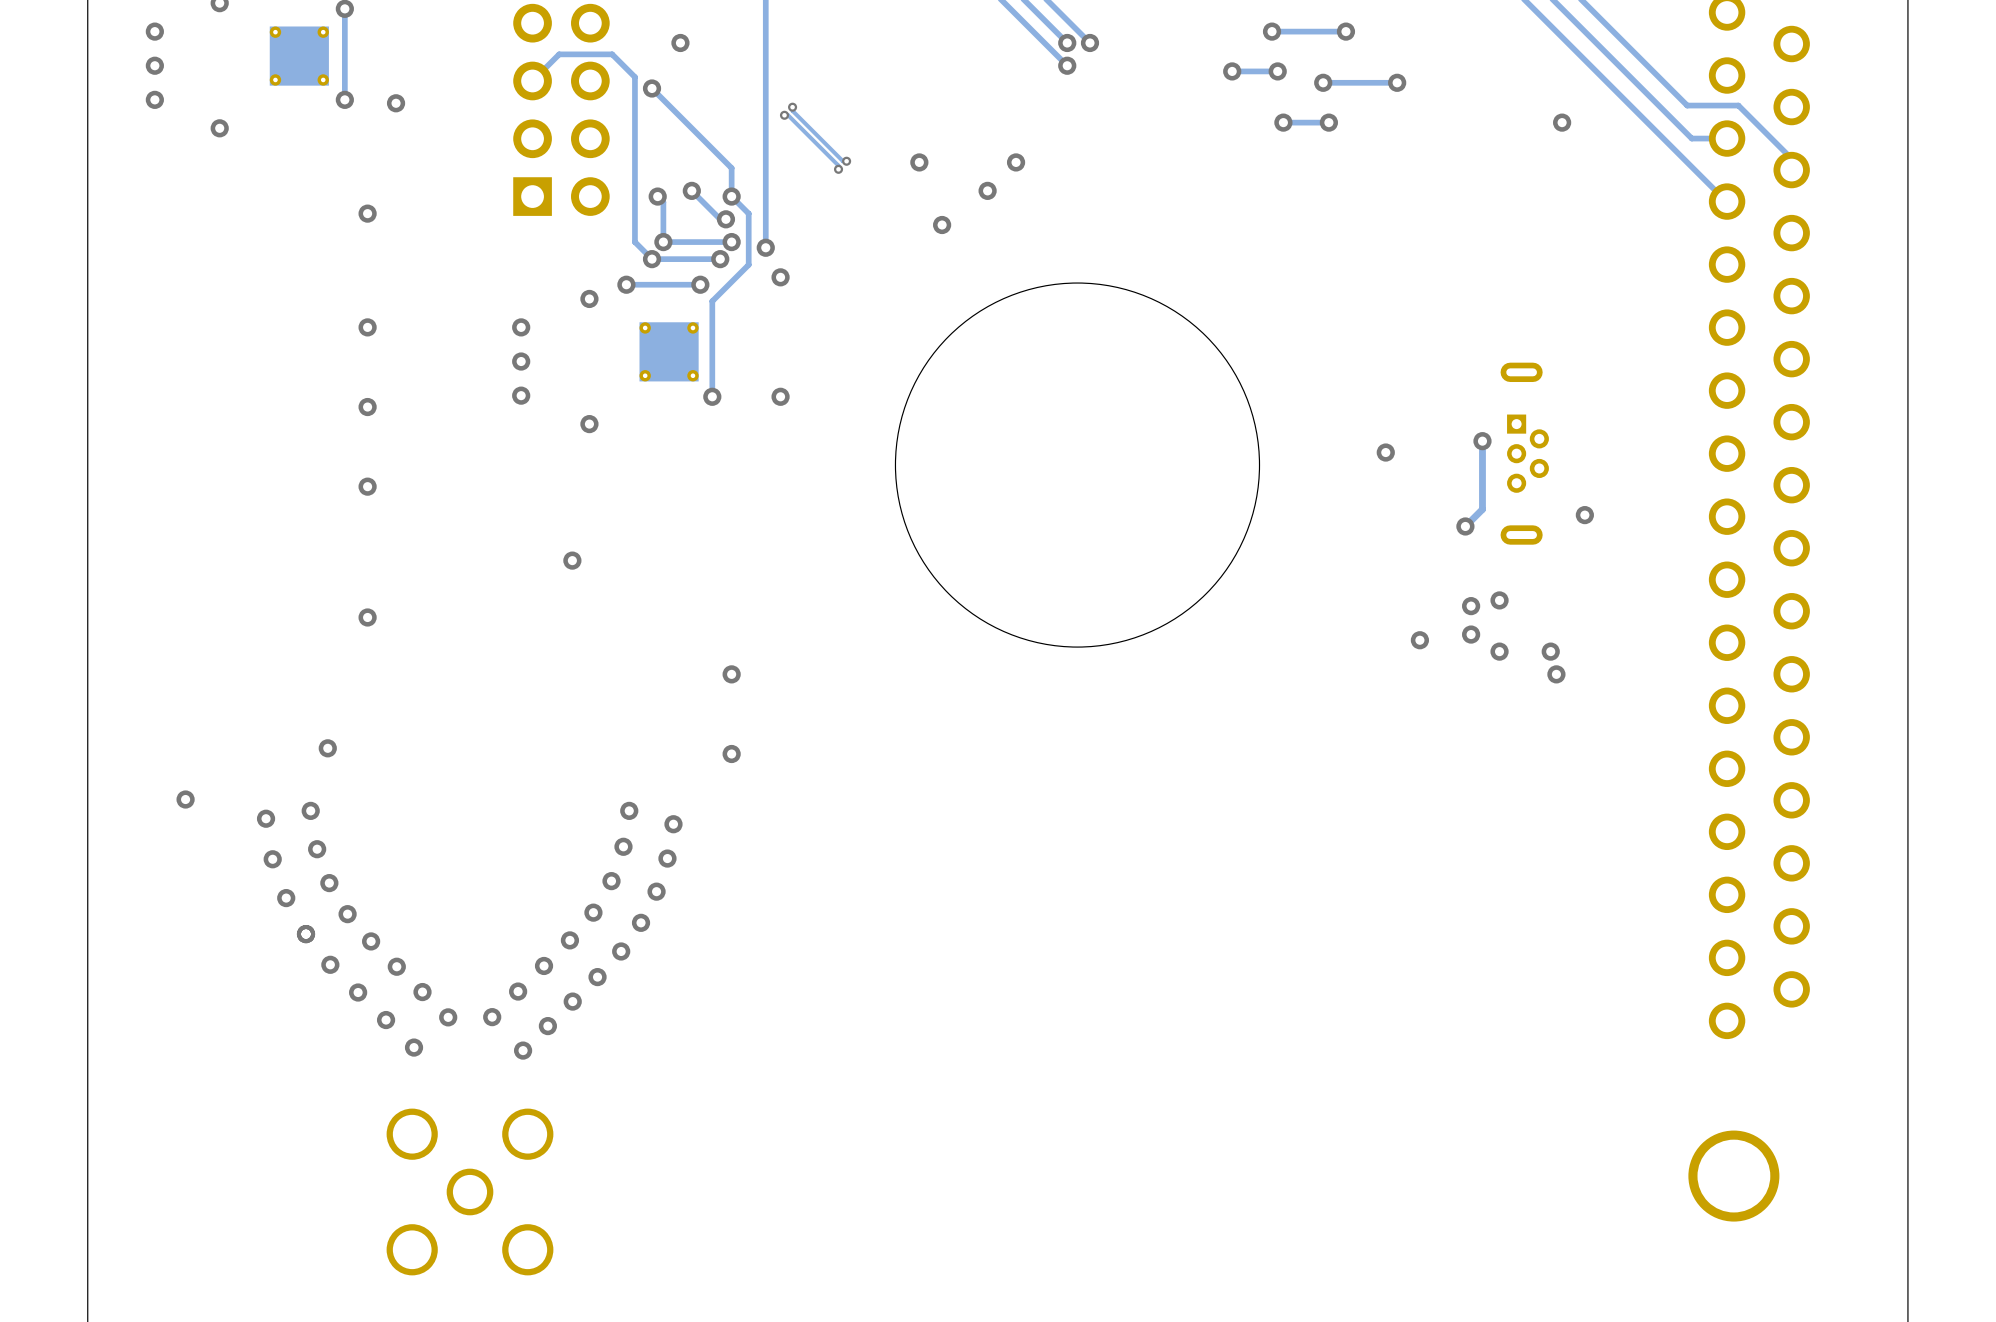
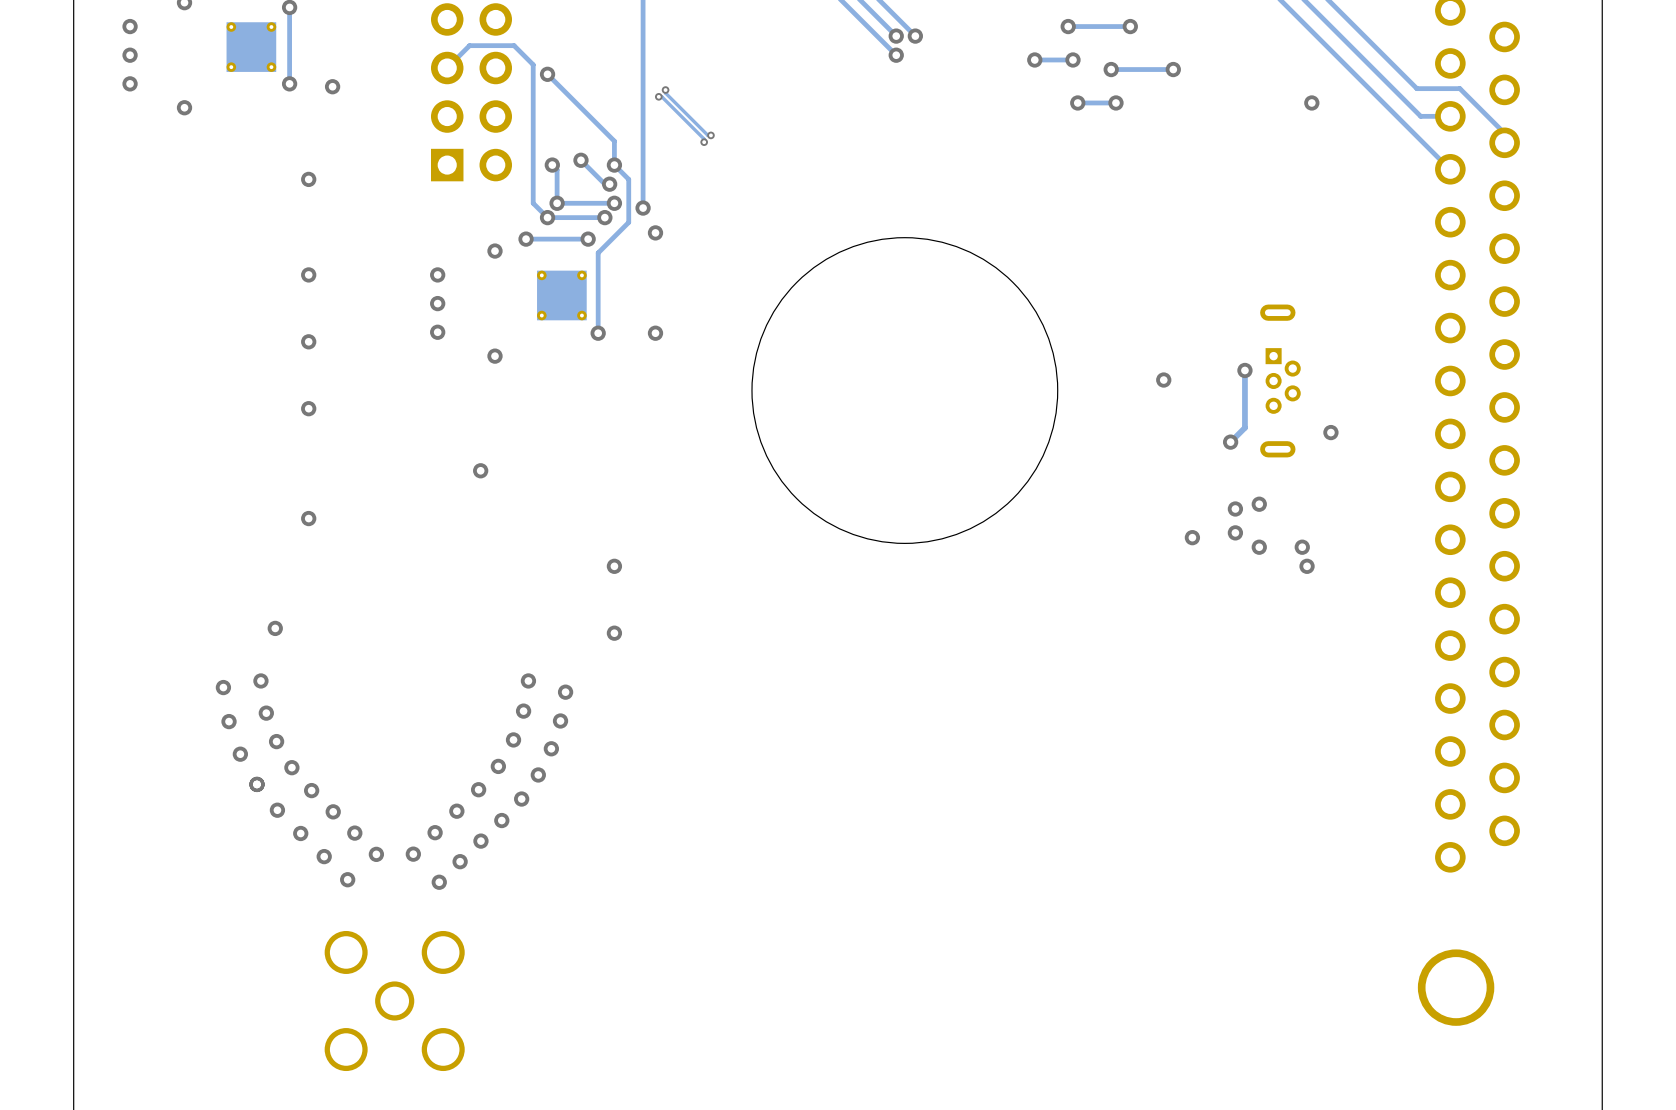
via: (680, 42) -> none
via: (919, 162) -> none
via: (1016, 162) -> none
via: (987, 190) -> none
via: (942, 225) -> none
via: (185, 799) -> none

